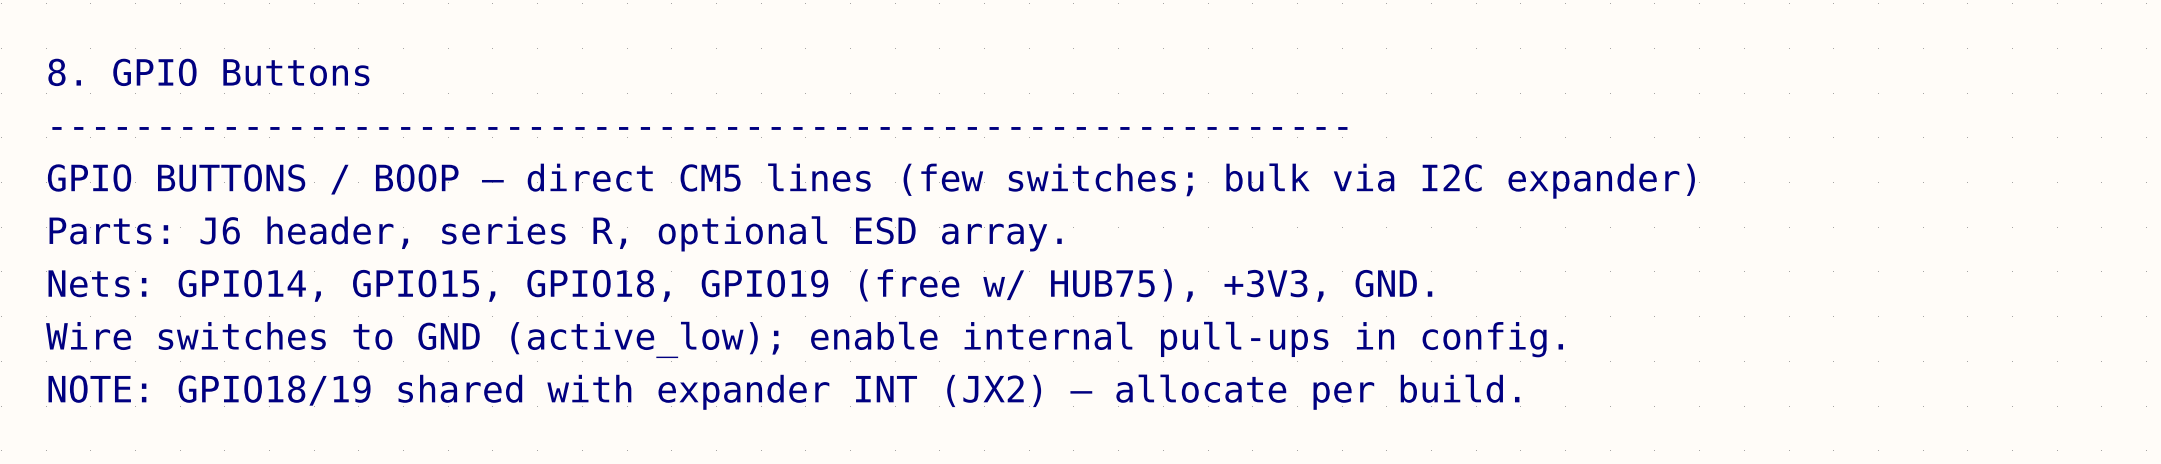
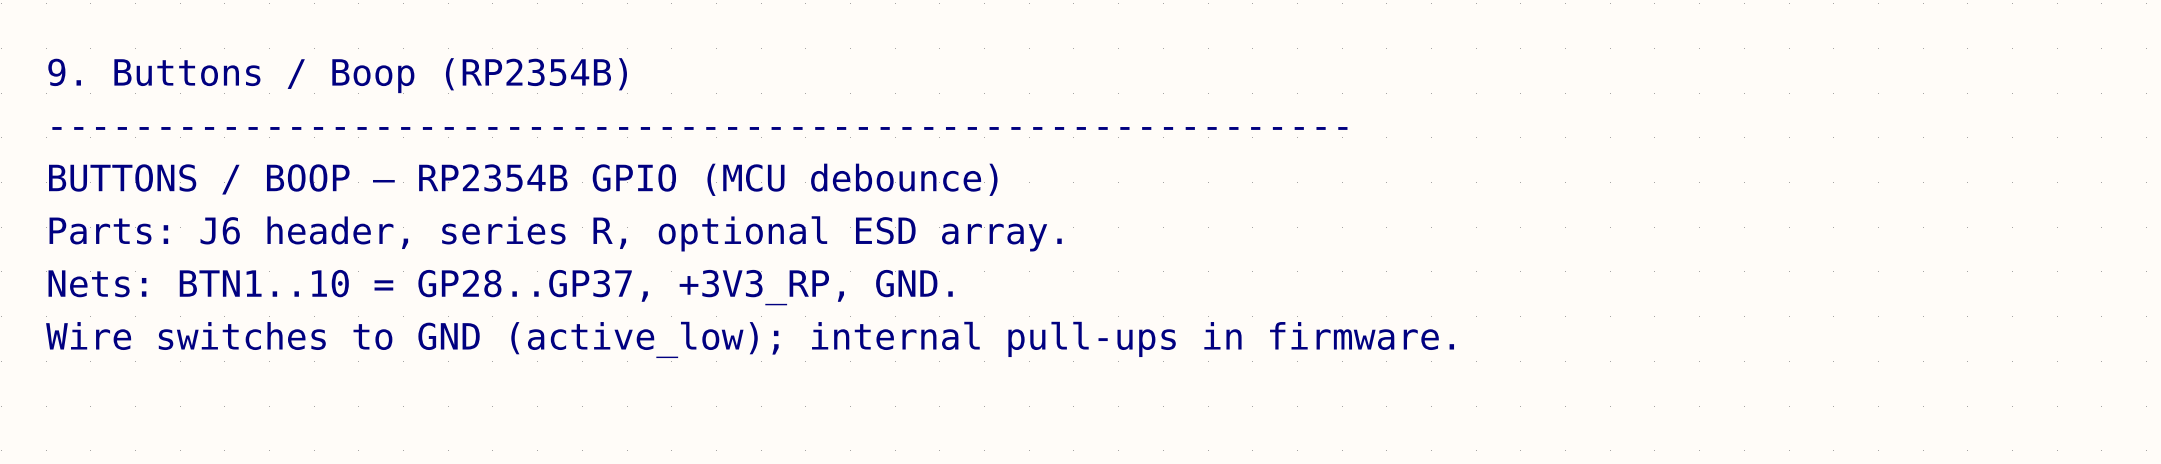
text: 8. GPIO Buttons (208, 72) -> 9. Buttons / Boop (RP2354B) (337, 75)
text: GPIO BUTTONS / BOOP — direct CM5 lines (few switches; bulk via I2C expander) (871, 181) -> BUTTONS / BOOP — RP2354B GPIO (MCU debounce) (523, 179)
text: Nets: GPIO14, GPIO15, GPIO18, GPIO19 (free w/ HUB75), +3V3, GND. (740, 285) -> Nets: BTN1..10 = GP28..GP37, +3V3_RP, GND. (500, 287)
text: Wire switches to GND (active_low); enable internal pull-ups in config. (804, 339) -> Wire switches to GND (active_low); internal pull-ups in firmware. (750, 339)
text: NOTE: GPIO18/19 shared with expander INT (JX2) — allocate per build. (783, 392) -> none

